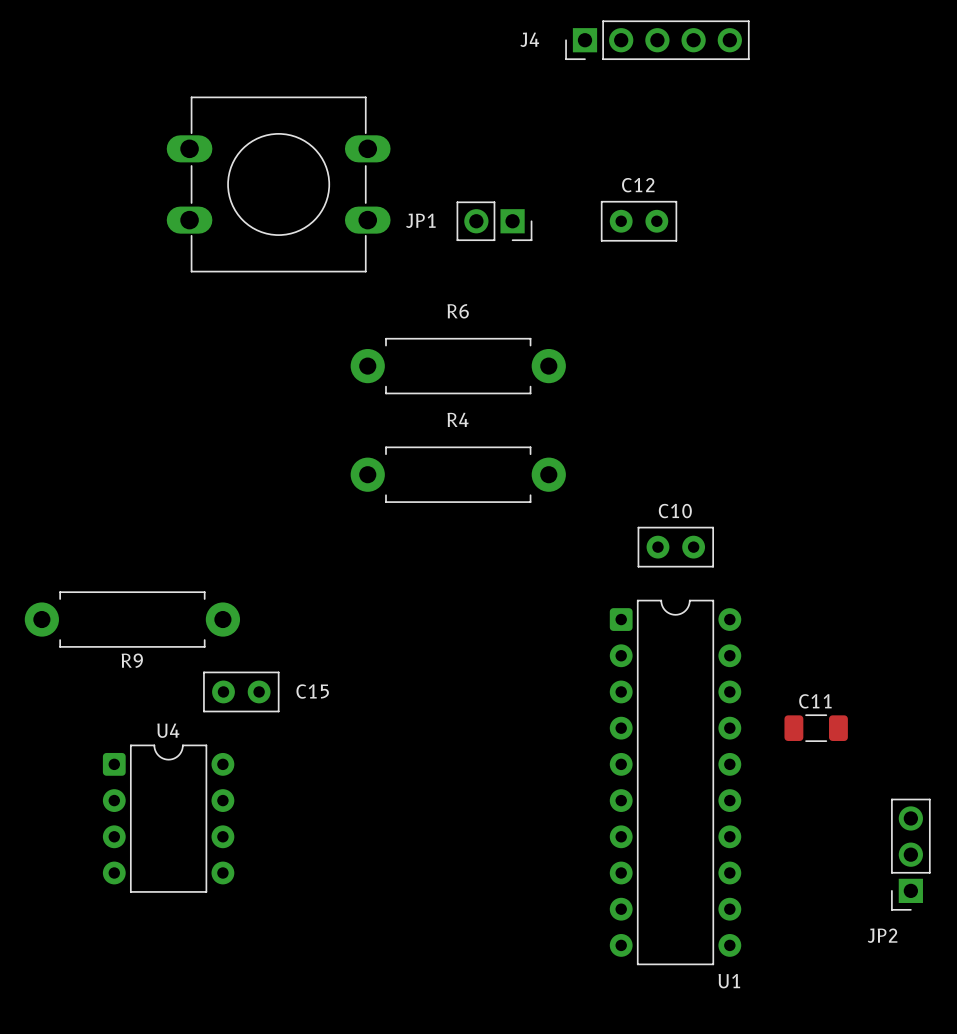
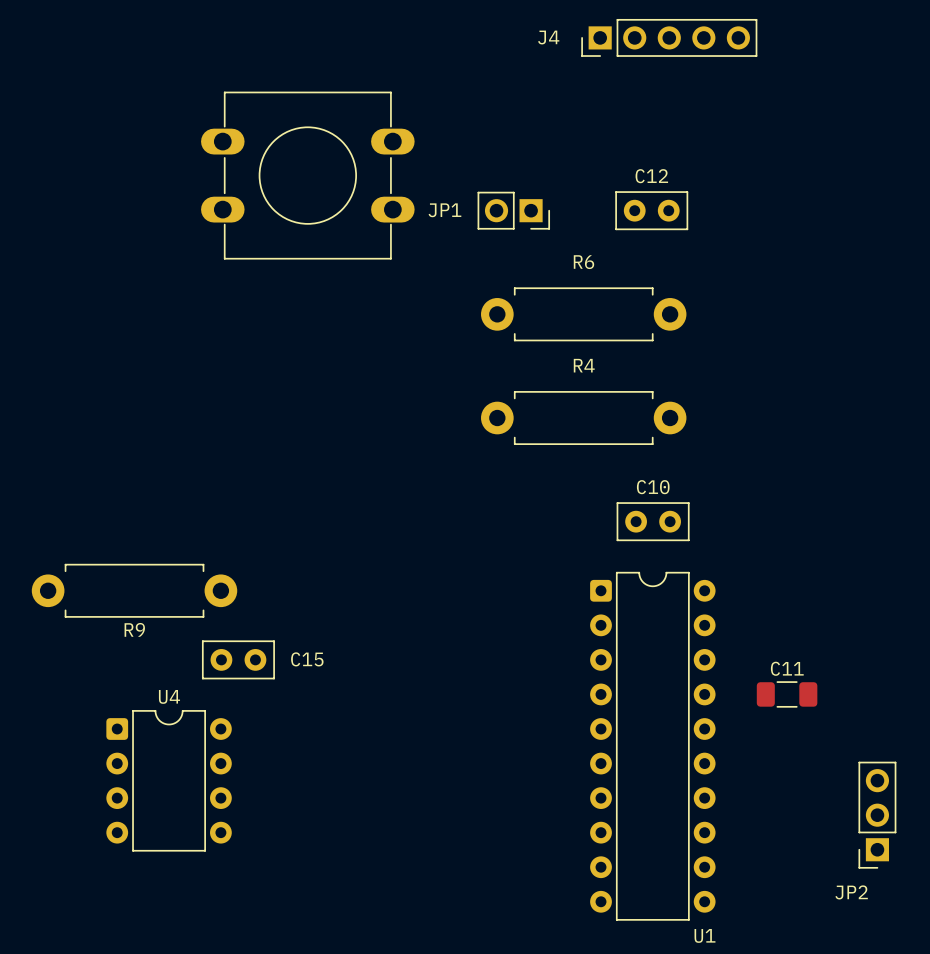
J4 position: (657, 40) -> (669, 37)
part position: (278, 184) -> (307, 175)
JP1 position: (494, 221) -> (513, 210)
C12 position: (639, 221) -> (651, 210)
R6 position: (458, 366) -> (583, 314)
R4 position: (458, 474) -> (583, 418)

